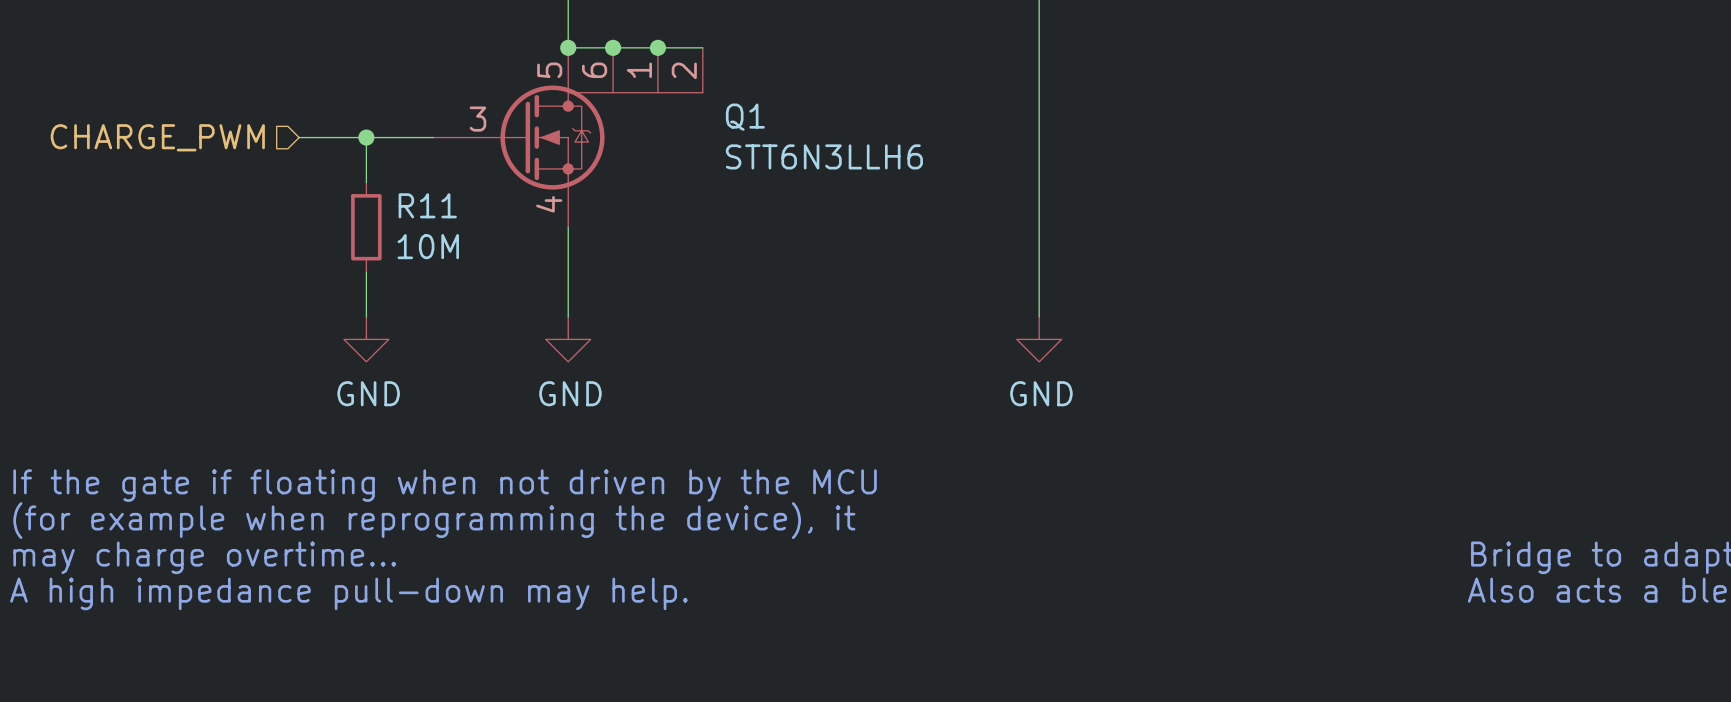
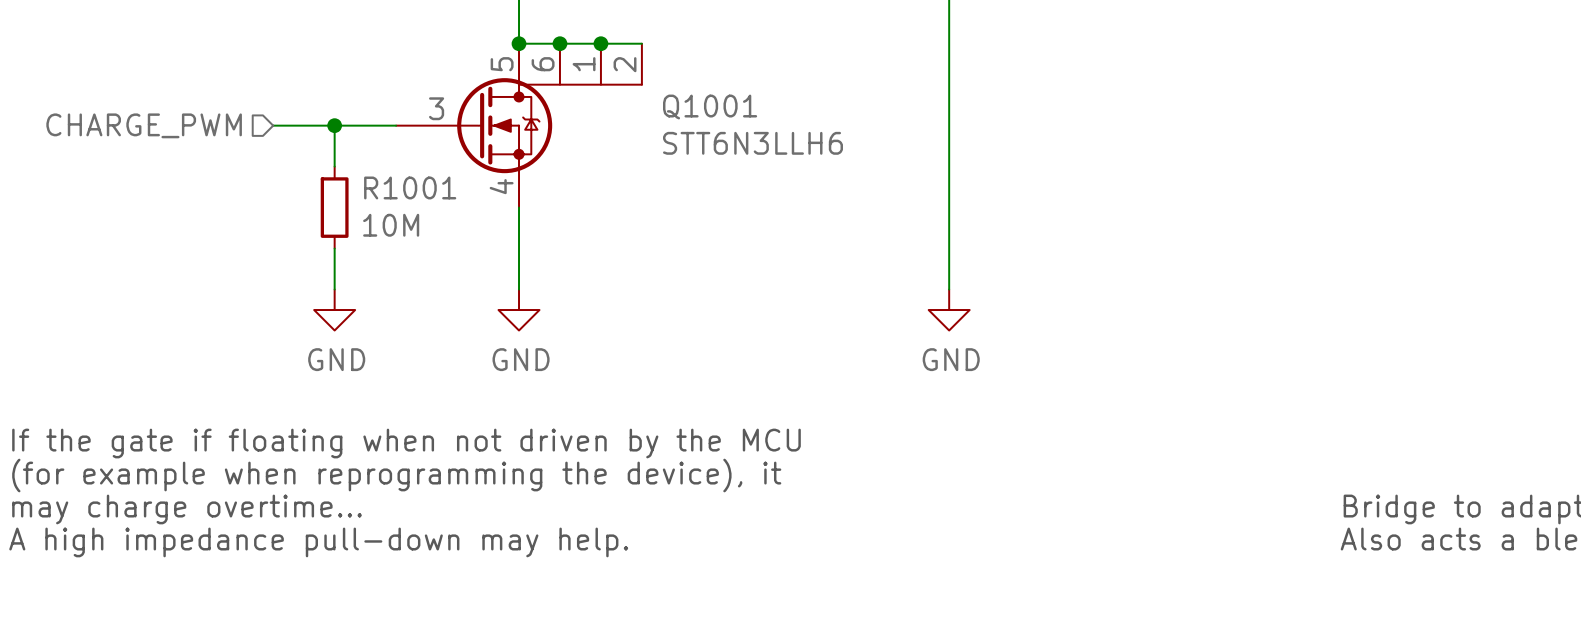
Q1 name: Q1 (745, 117) -> Q1001 (710, 107)
R11 name: R11 (427, 205) -> R1001 (410, 187)

